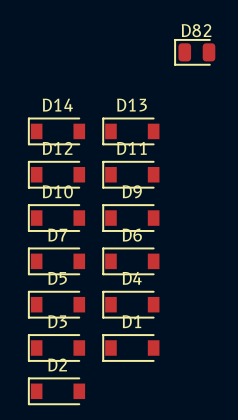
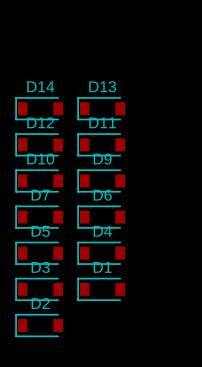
D82: (194, 52) -> none

